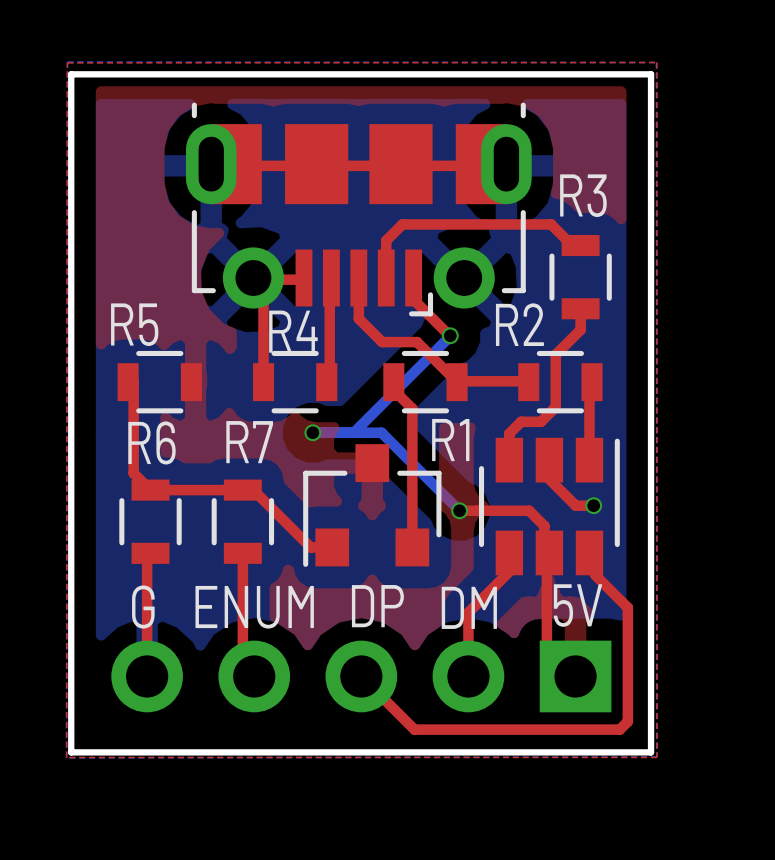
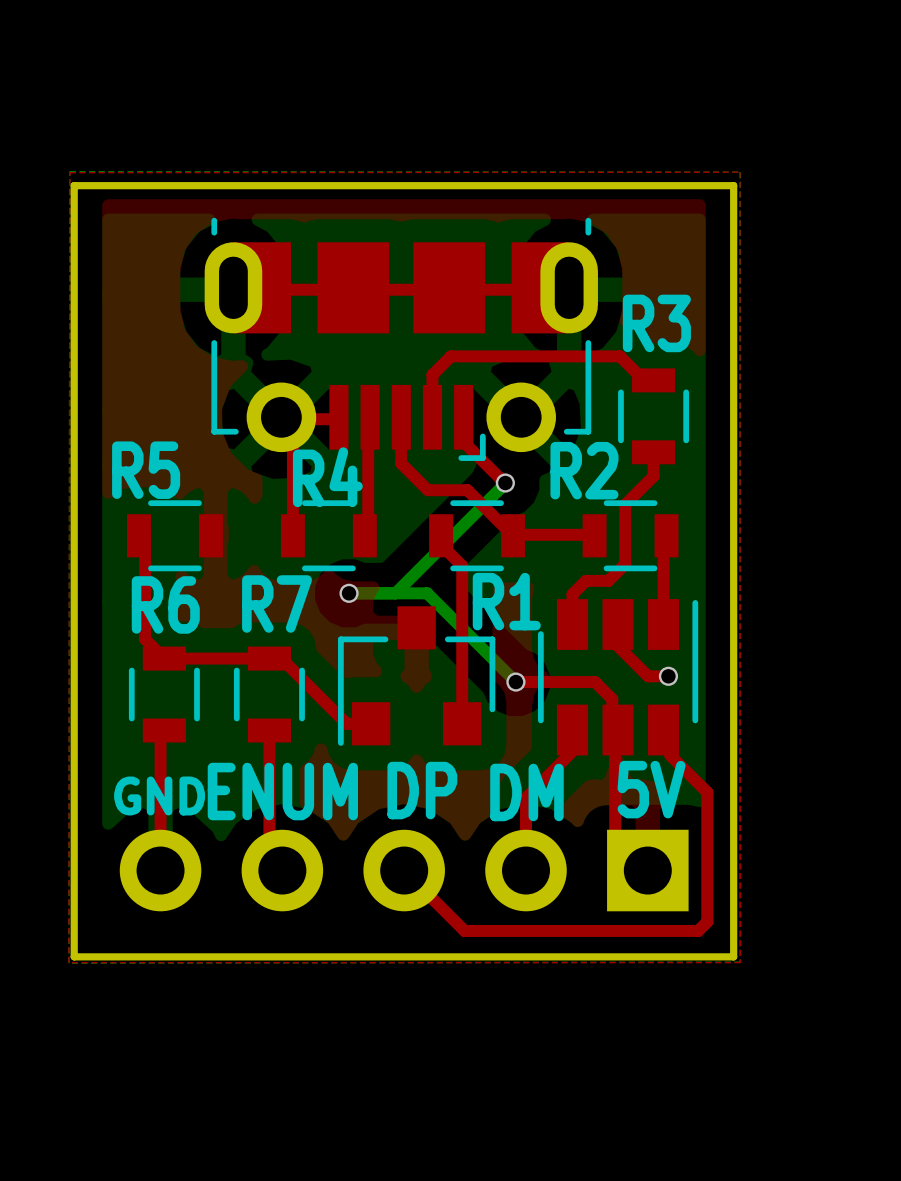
text: G (143, 607) -> GND (159, 795)

